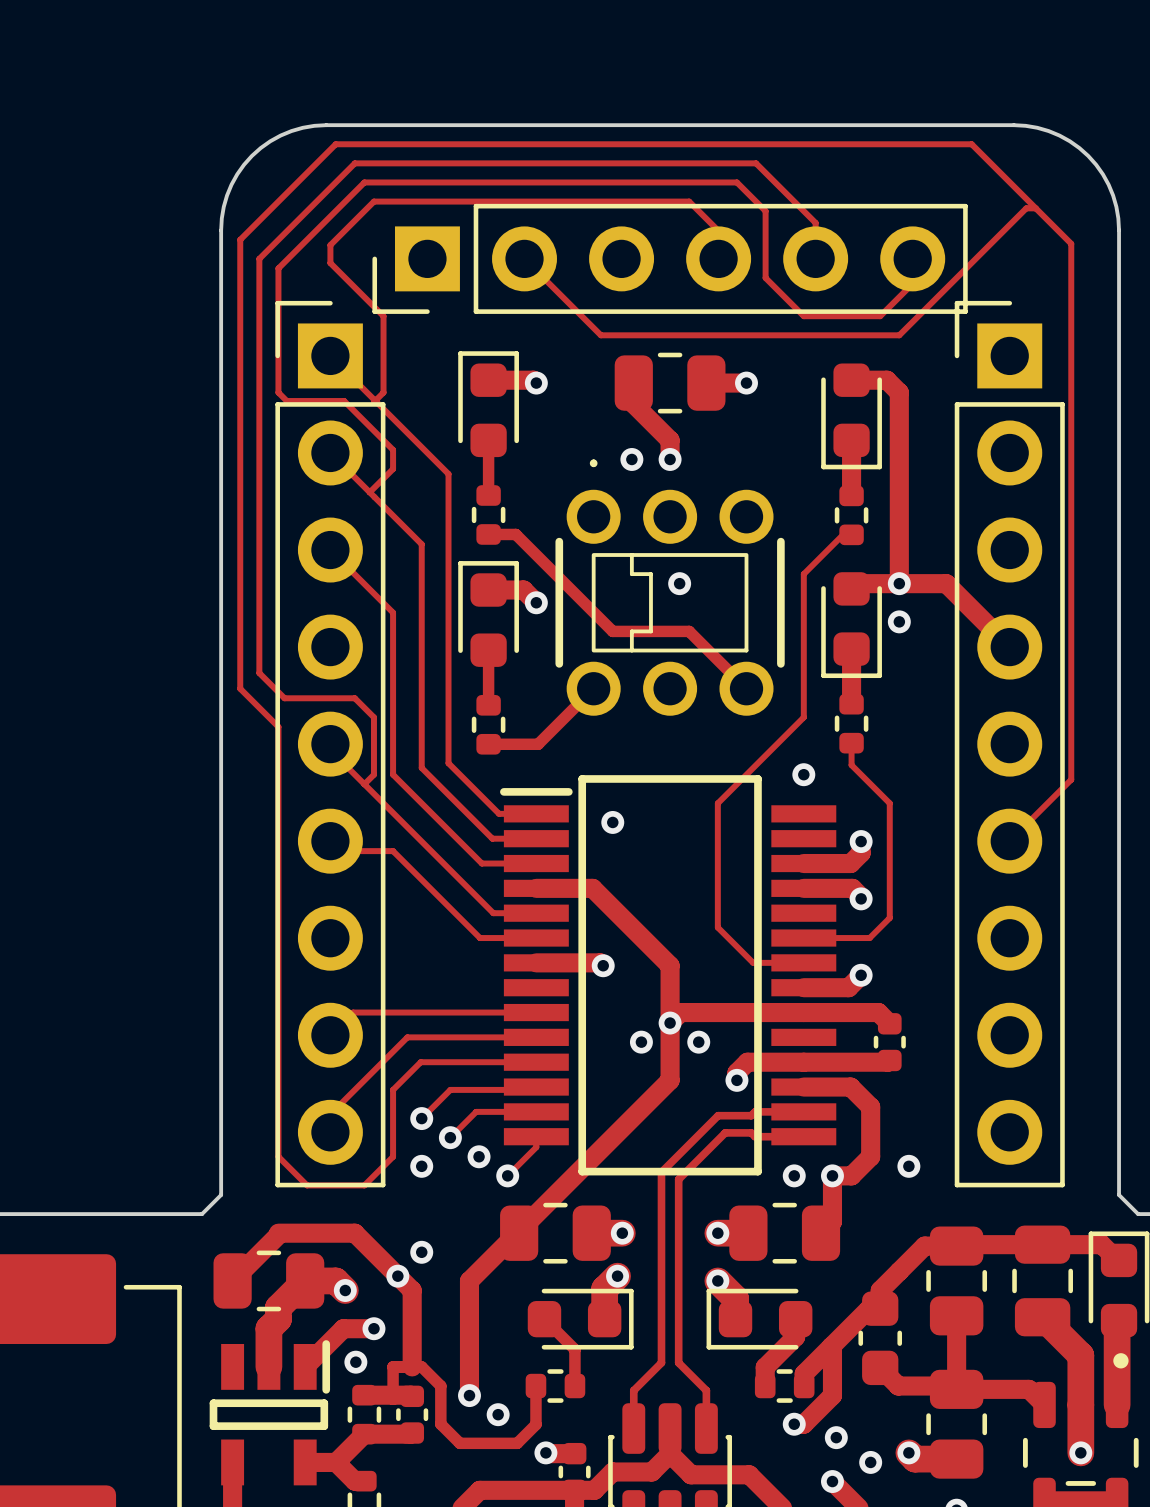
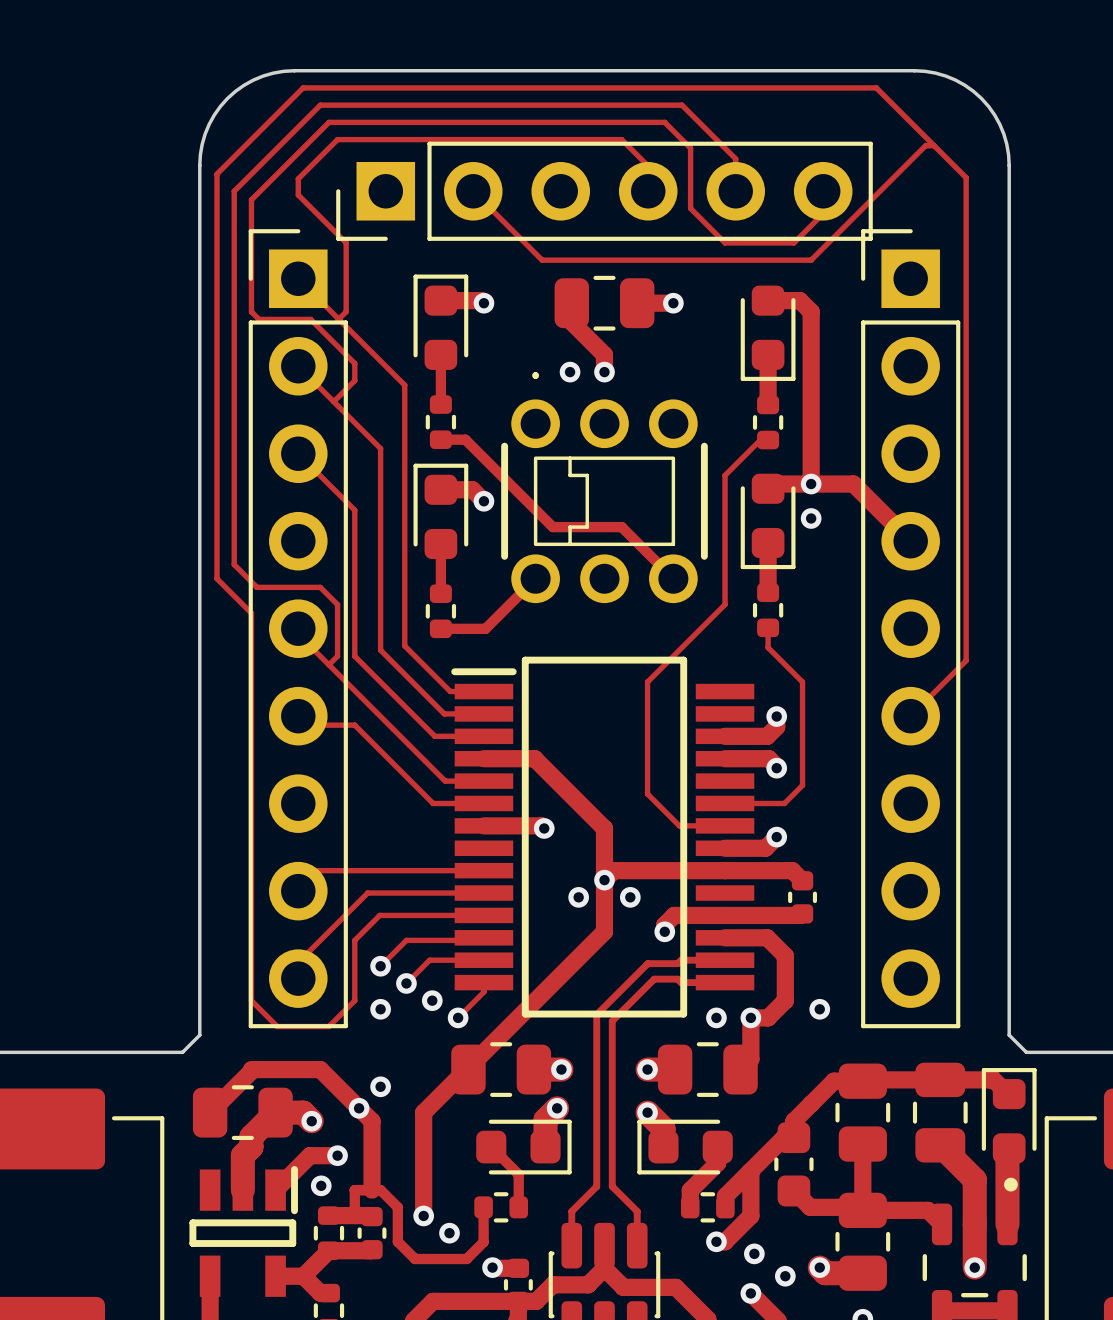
via: (679, 583) -> none
via: (803, 774) -> none
via: (612, 822) -> none

